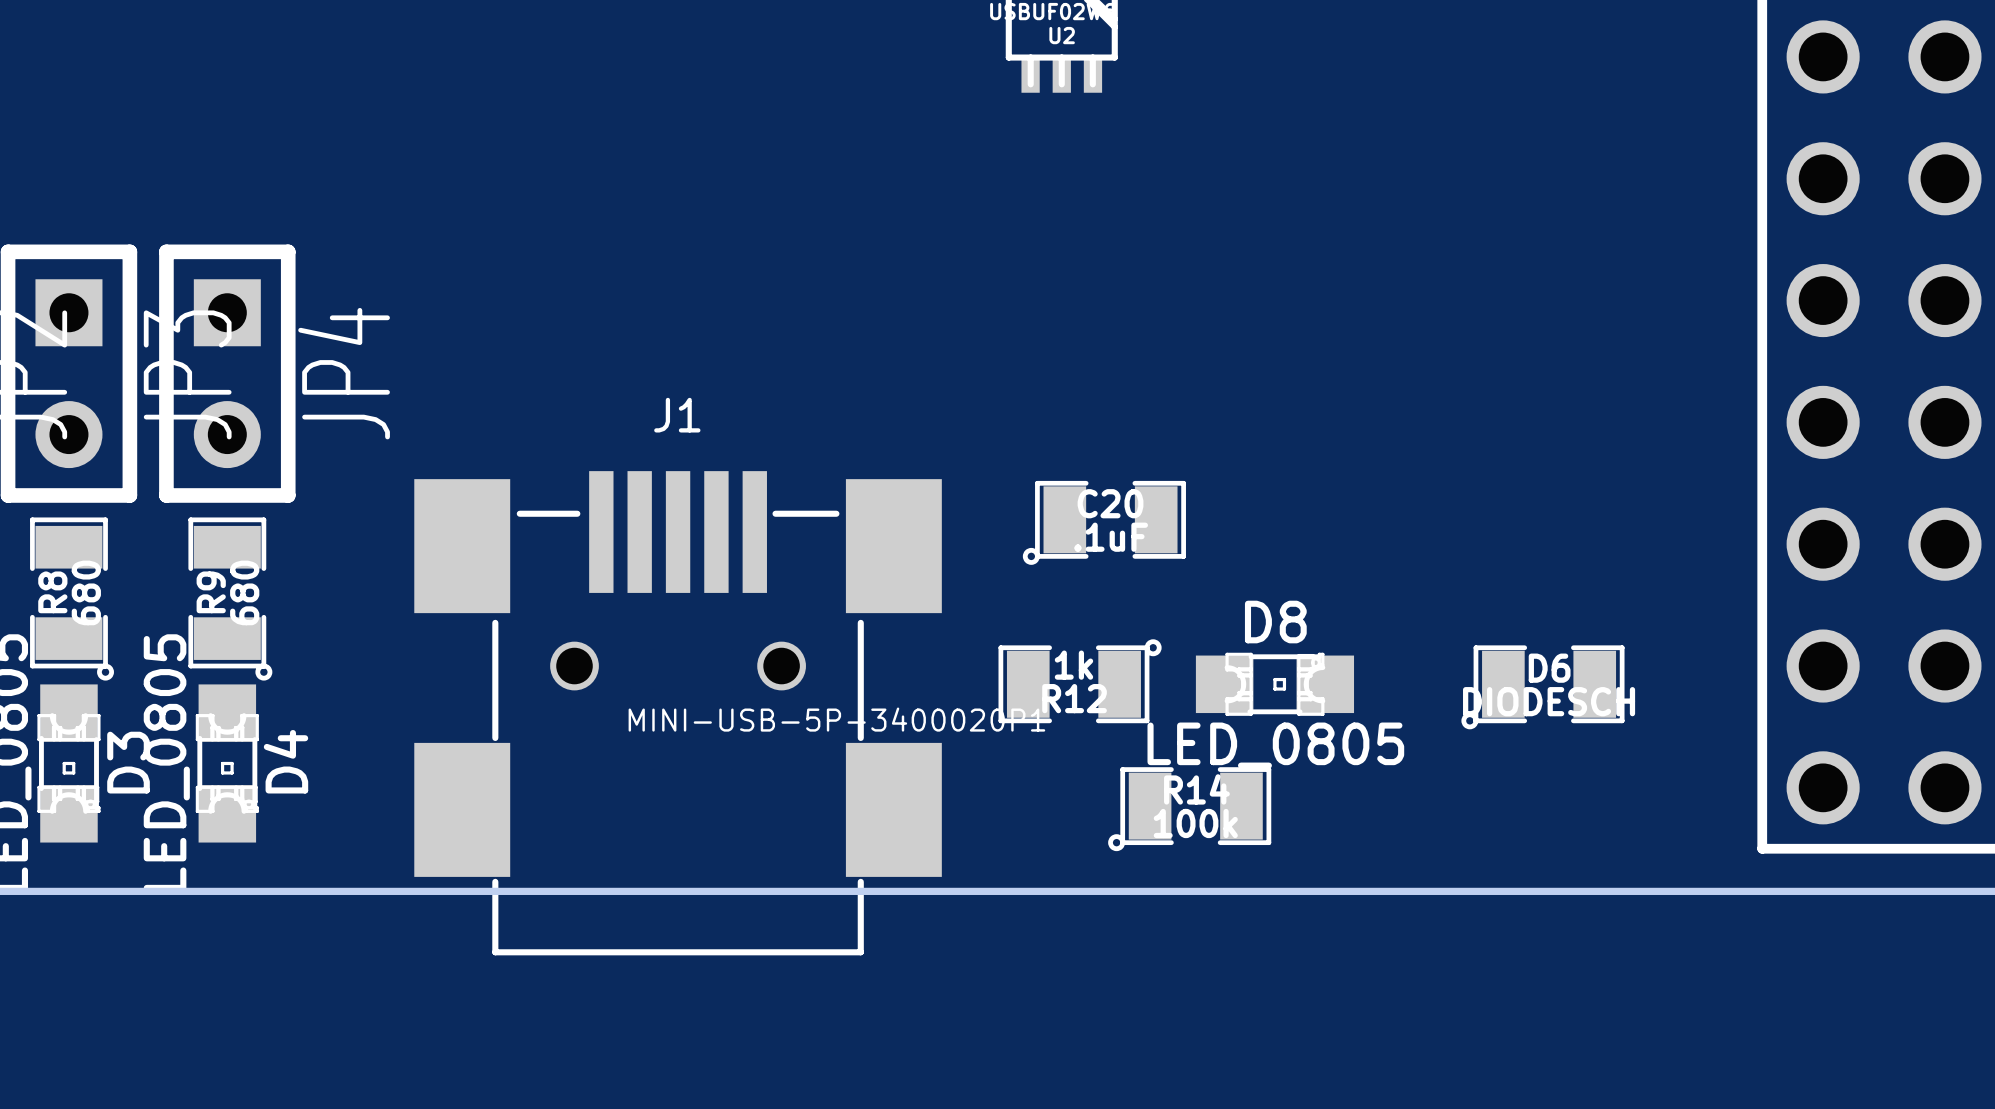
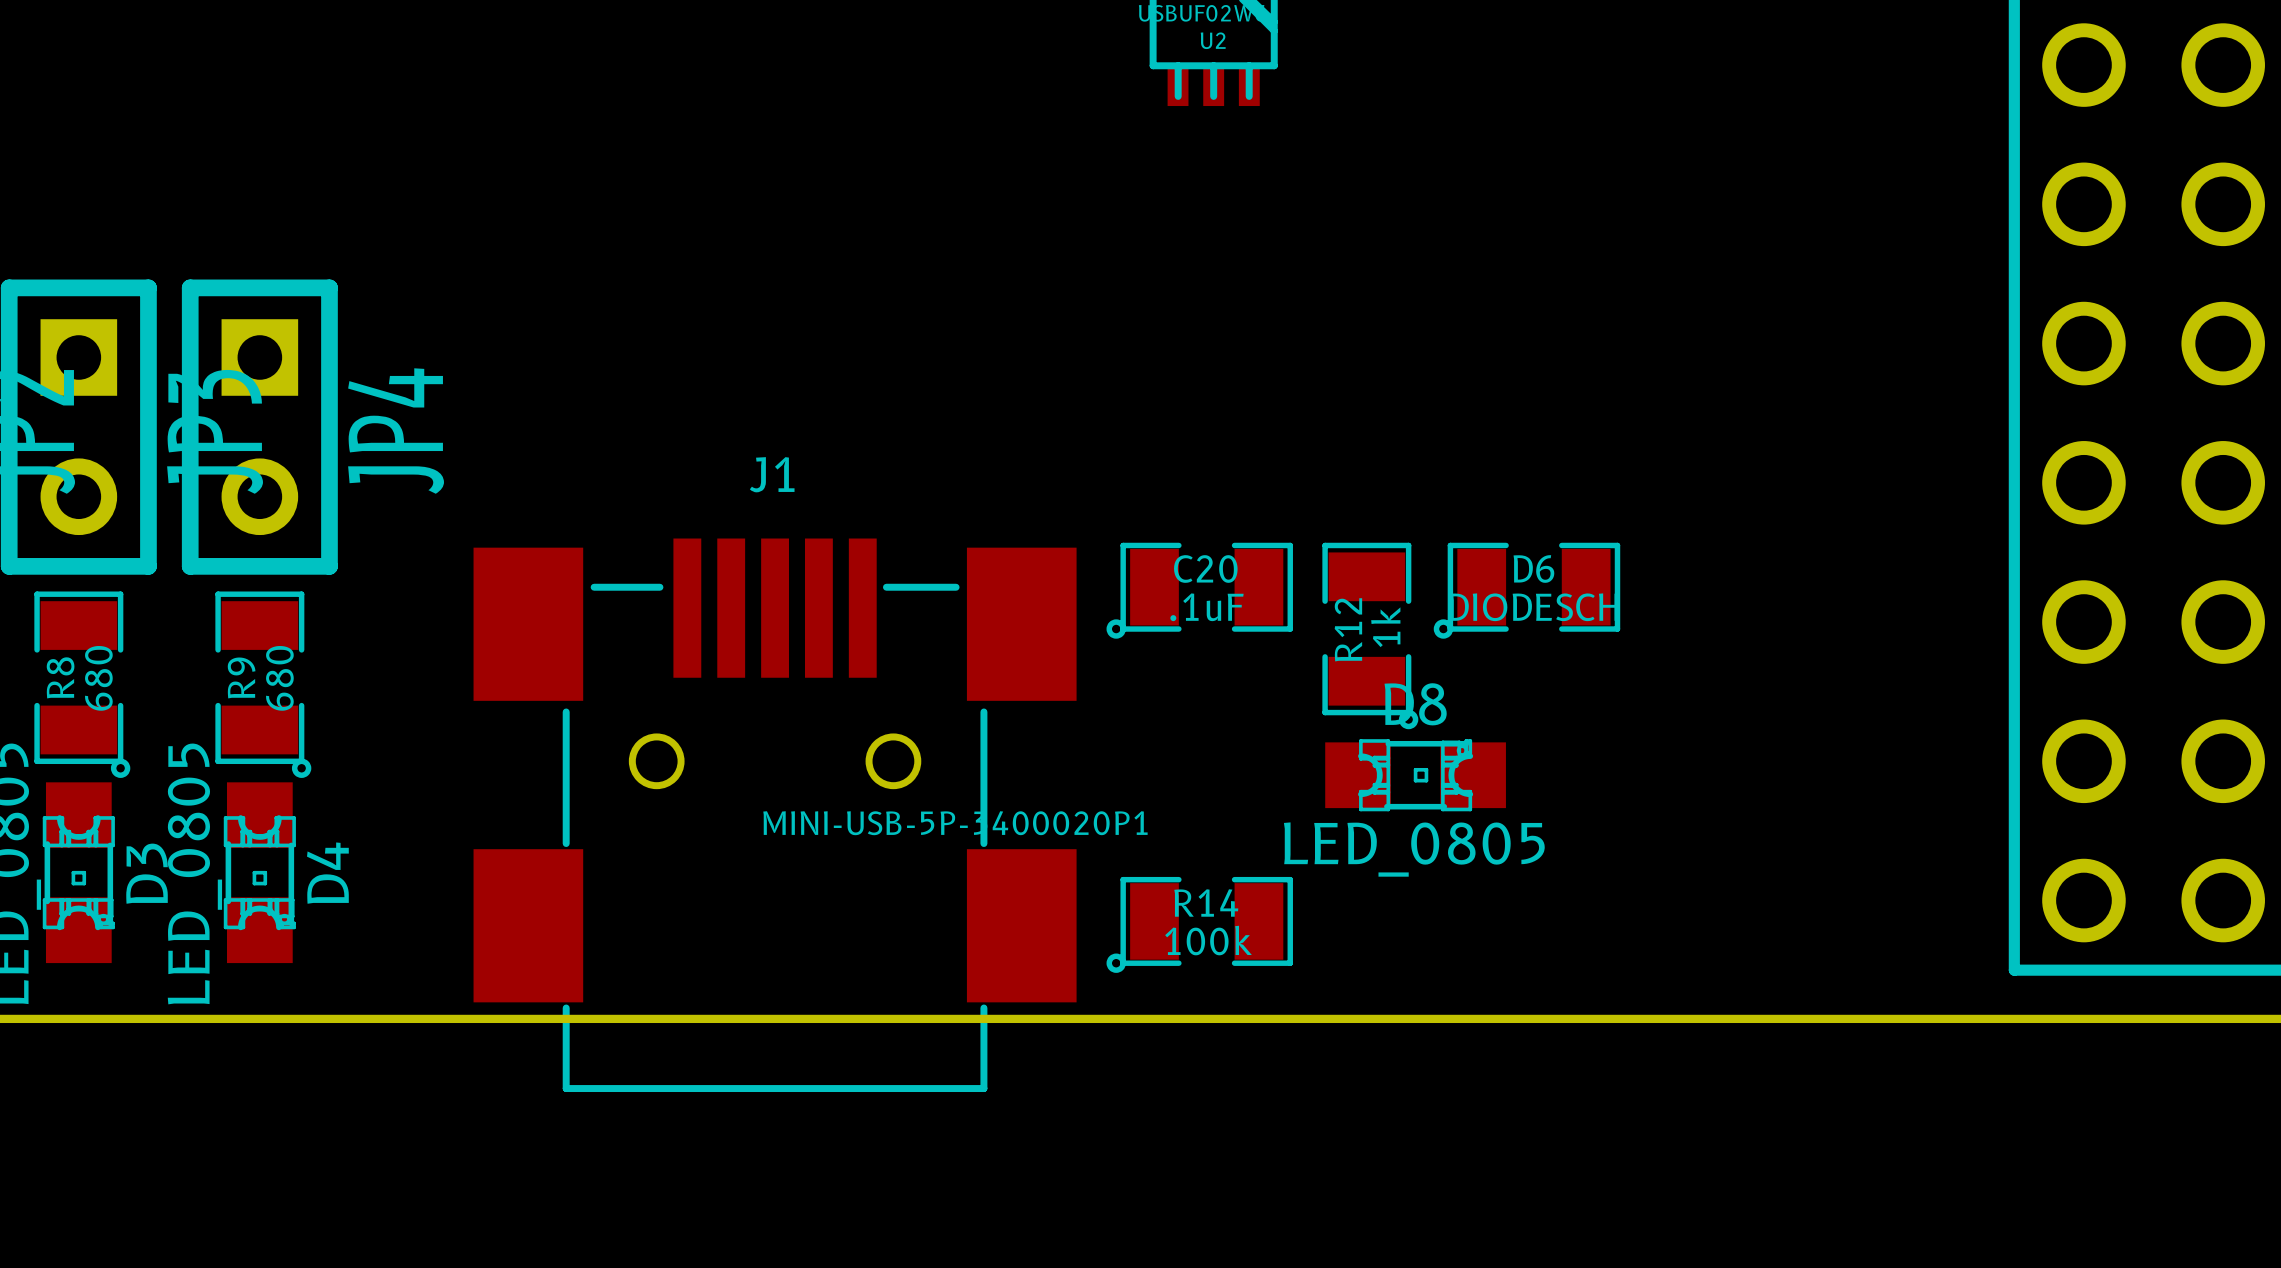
C20 position: (1104, 522) -> (1199, 590)
R12 rotation: 0° (1080, 681) -> 90° clockwise (1370, 635)
R12 position: (1080, 681) -> (1370, 635)
D8 position: (1274, 684) -> (1415, 775)
D6 position: (1542, 687) -> (1526, 590)
R14 position: (1189, 809) -> (1199, 924)

